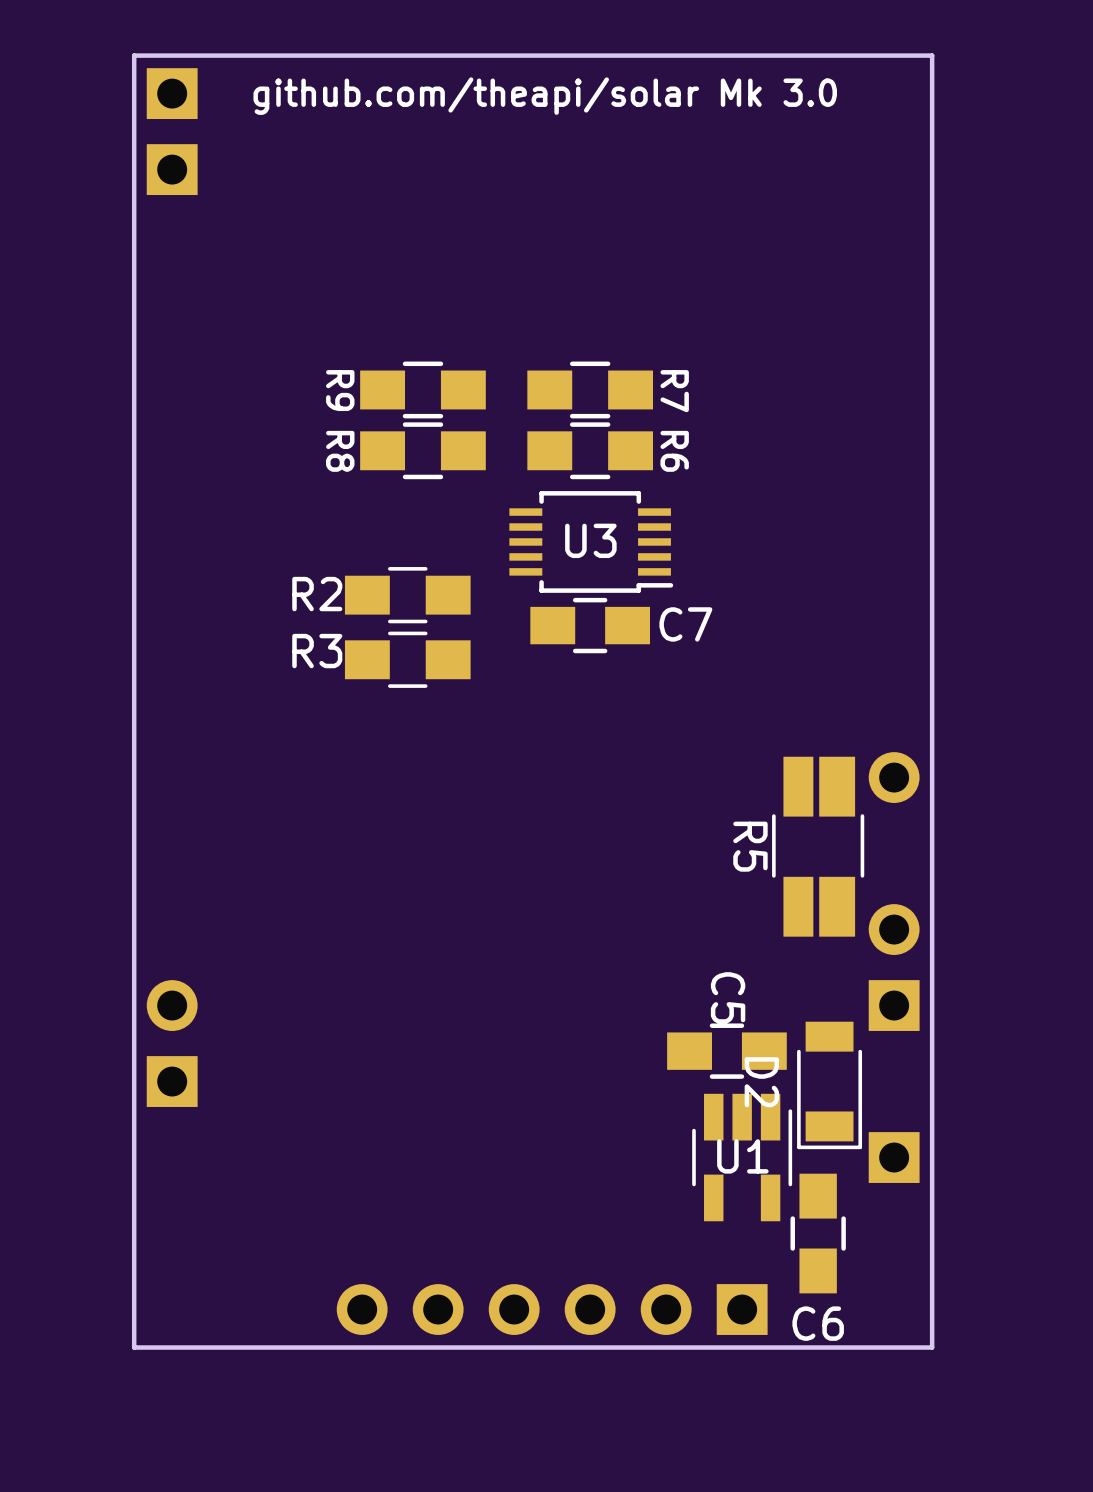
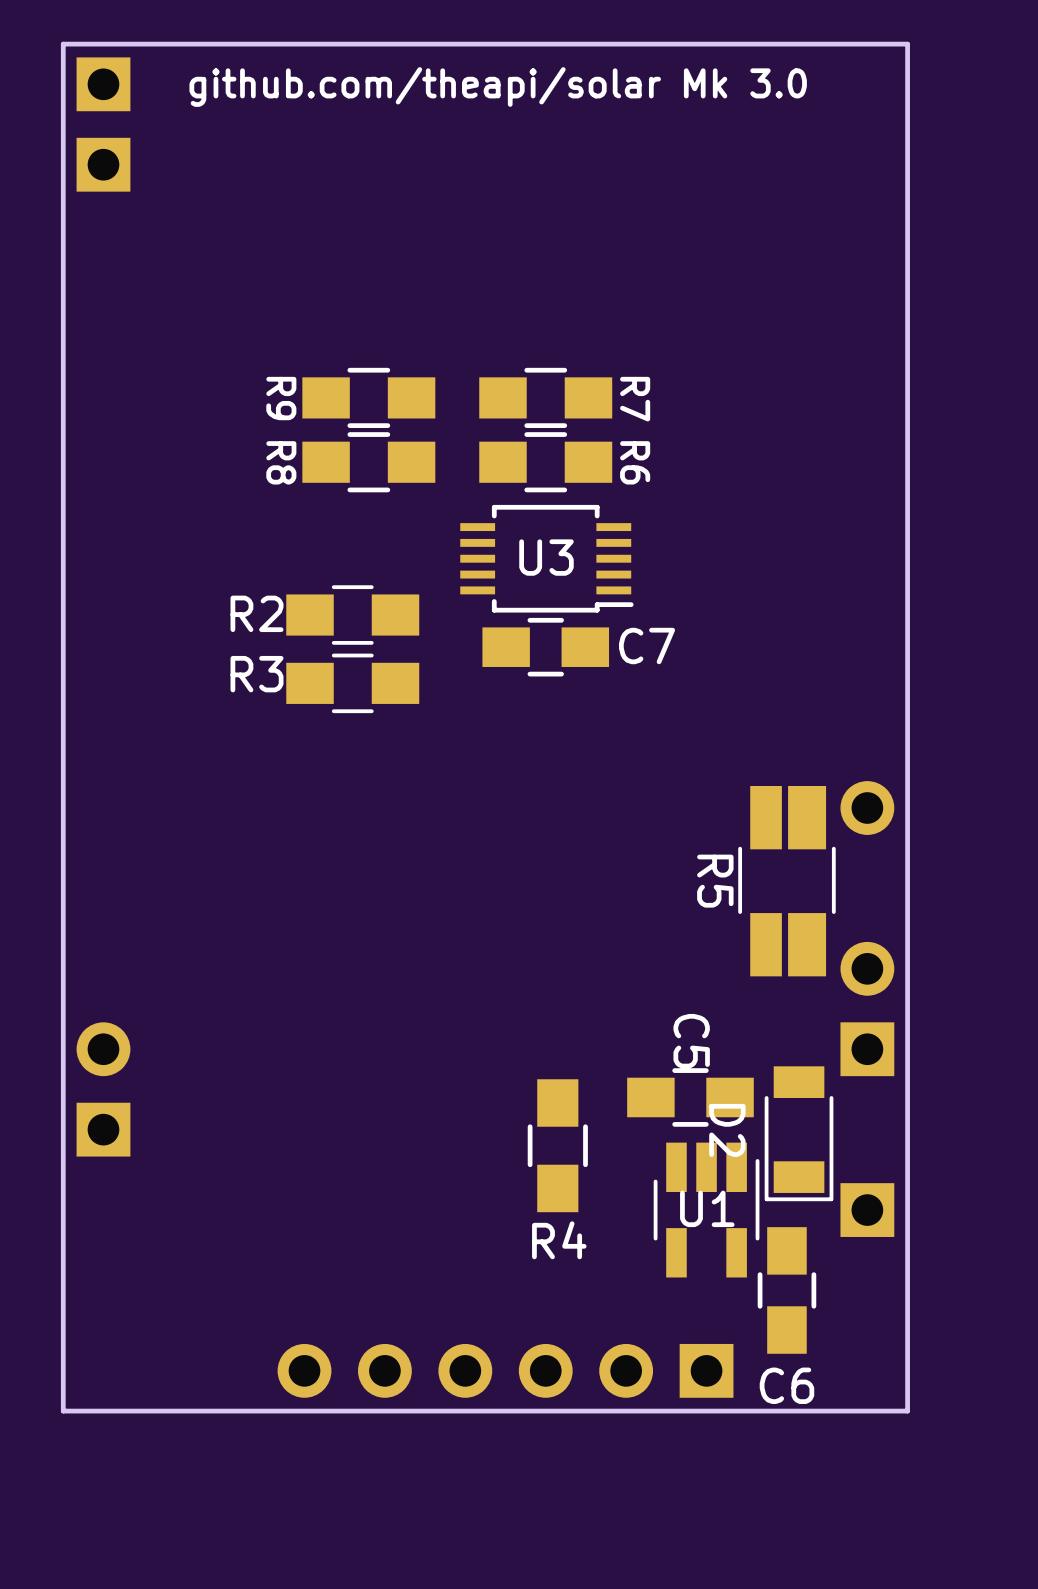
R4: none -> (557, 1145)

